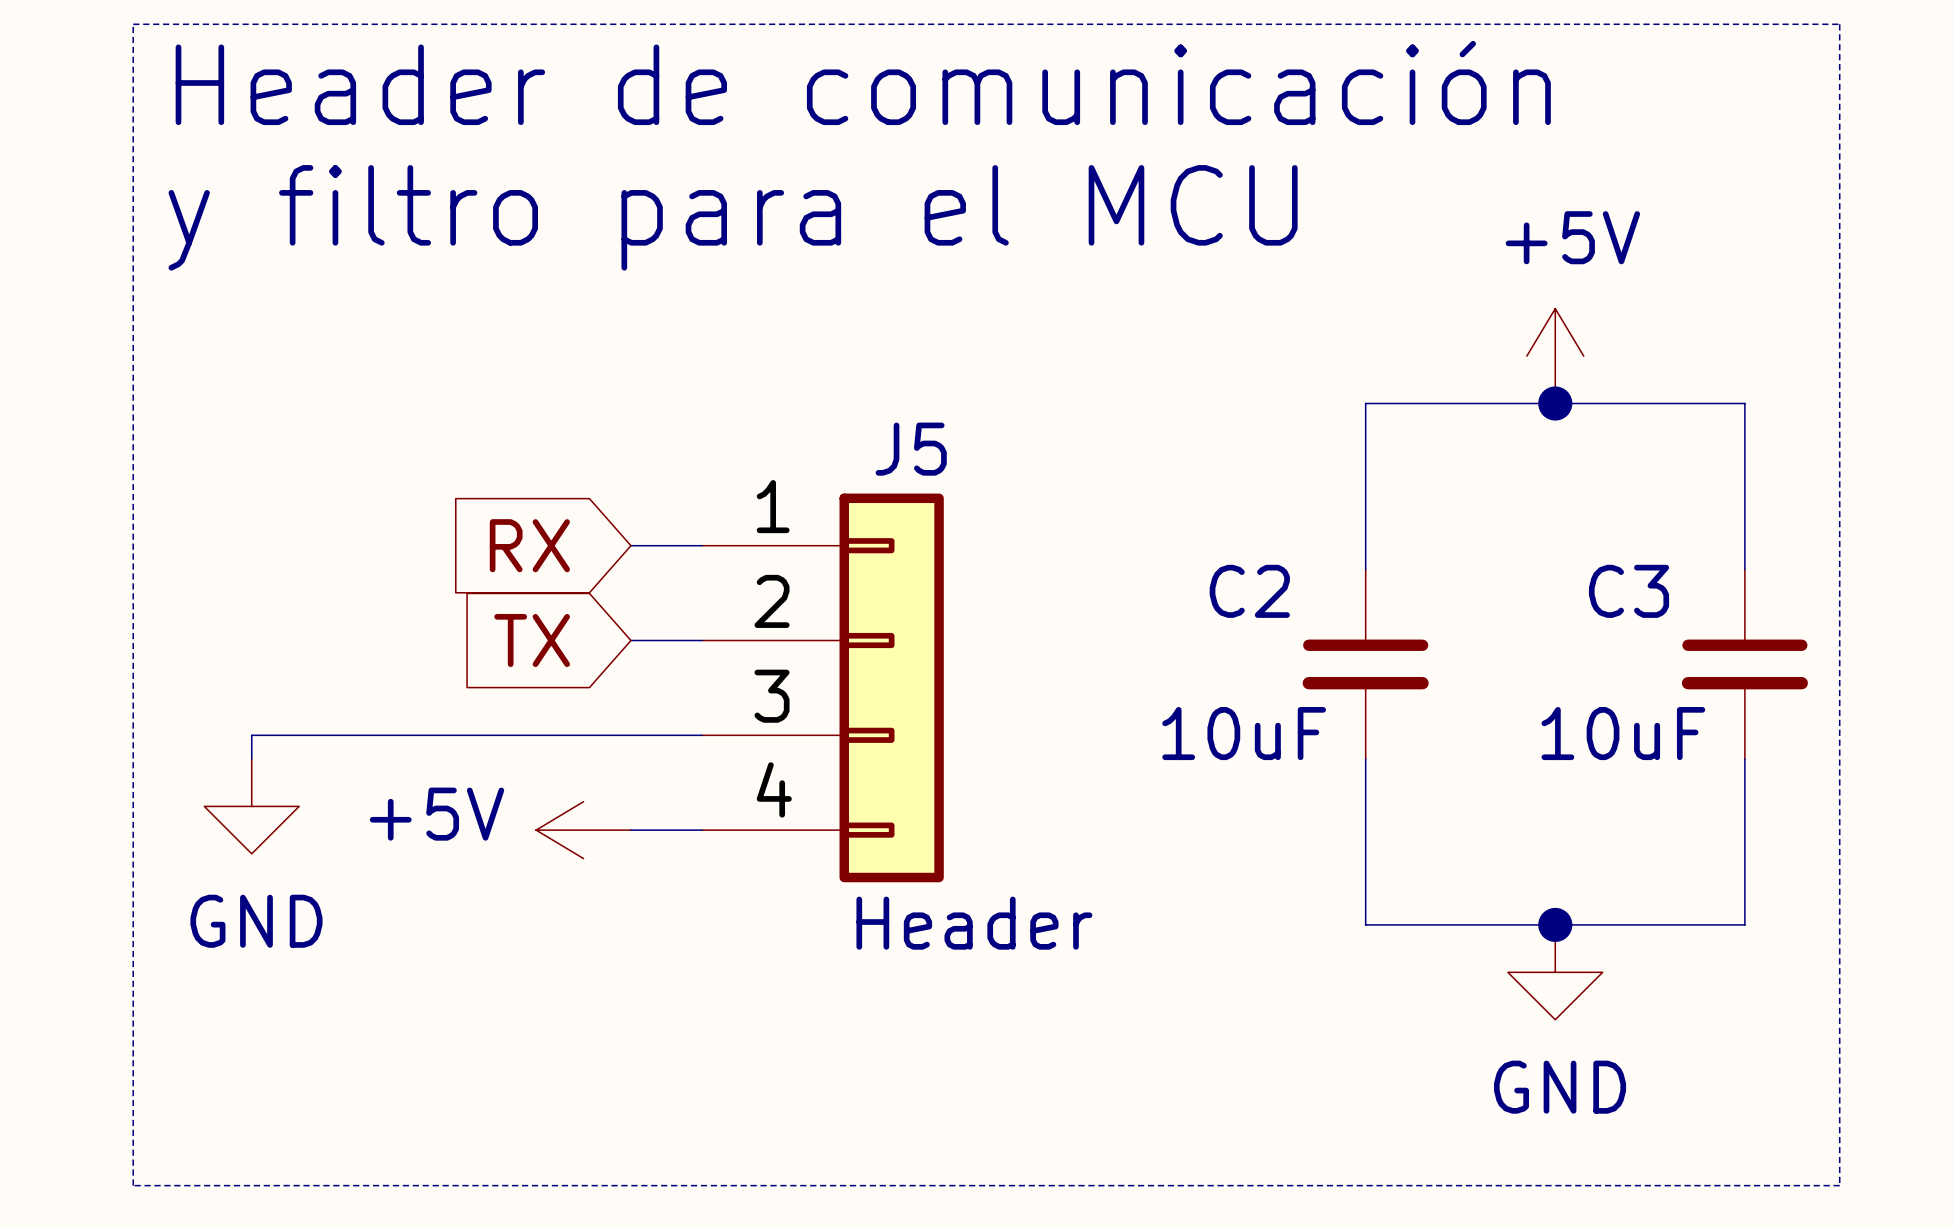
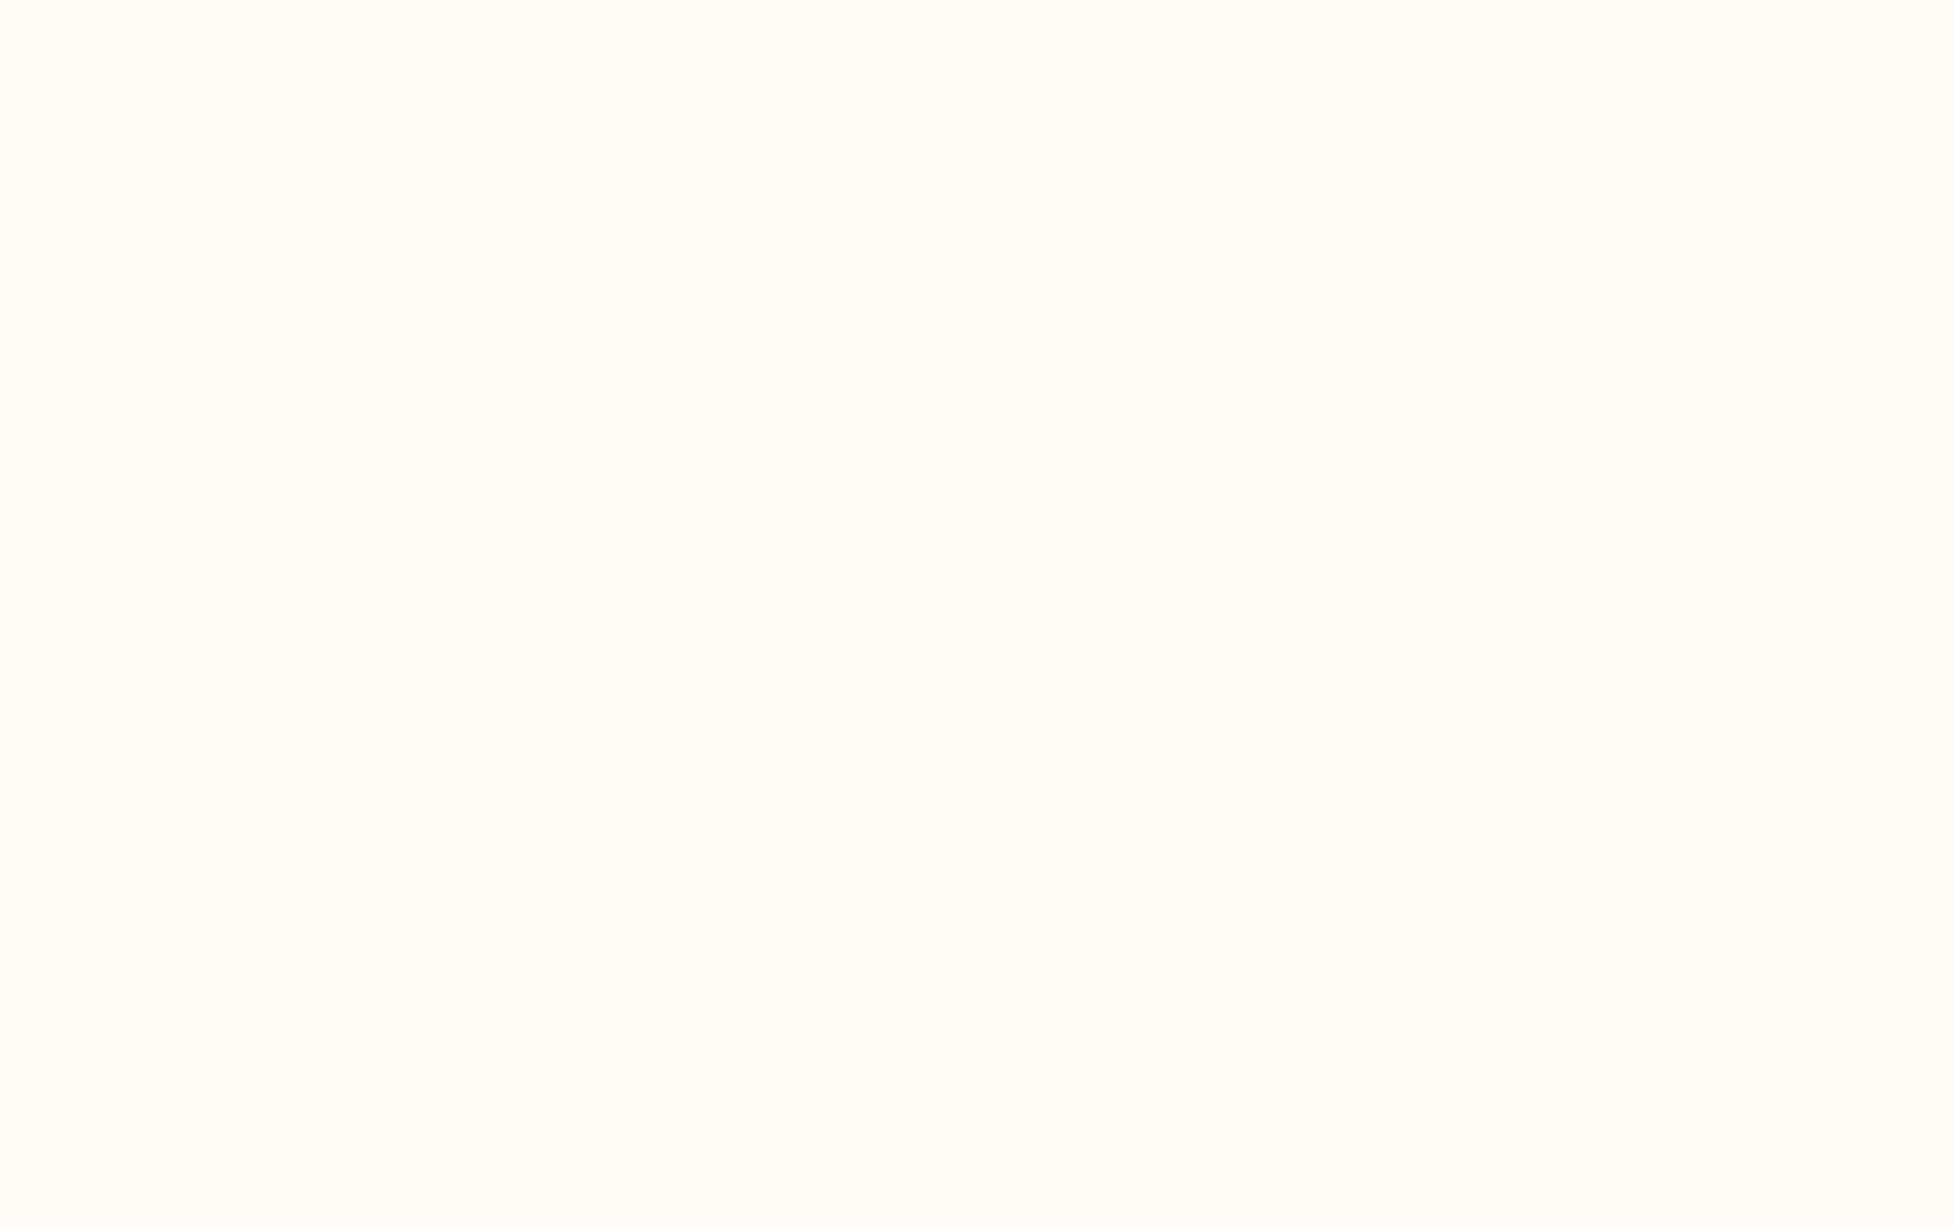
line: (133, 24) (133, 1185) (1839, 1185) (1839, 24) (133, 24) -> none
text: Header de comunicación (863, 82) -> none
text: y filtro para el MCU (733, 217) -> none
power symbol: +5V (1555, 356) -> none
junction: (1555, 403) -> none
global label: RX (529, 545) -> none
wire: (630, 545) (702, 545) -> none
wire: (1365, 569) (1365, 403) (1744, 403) (1744, 569) -> none
global label: TX (532, 640) -> none
wire: (630, 640) (702, 640) -> none
C2: 10uF (1365, 664) -> none
C3: 10uF (1744, 664) -> none
J5: Header (822, 687) -> none
wire: (702, 735) (251, 735) (251, 759) -> none
wire: (1365, 759) (1365, 924) (1744, 924) (1744, 759) -> none
power symbol: GND (251, 806) -> none
power symbol: +5V (583, 830) -> none
wire: (630, 830) (702, 830) -> none
junction: (1555, 924) -> none
power symbol: GND (1555, 972) -> none

